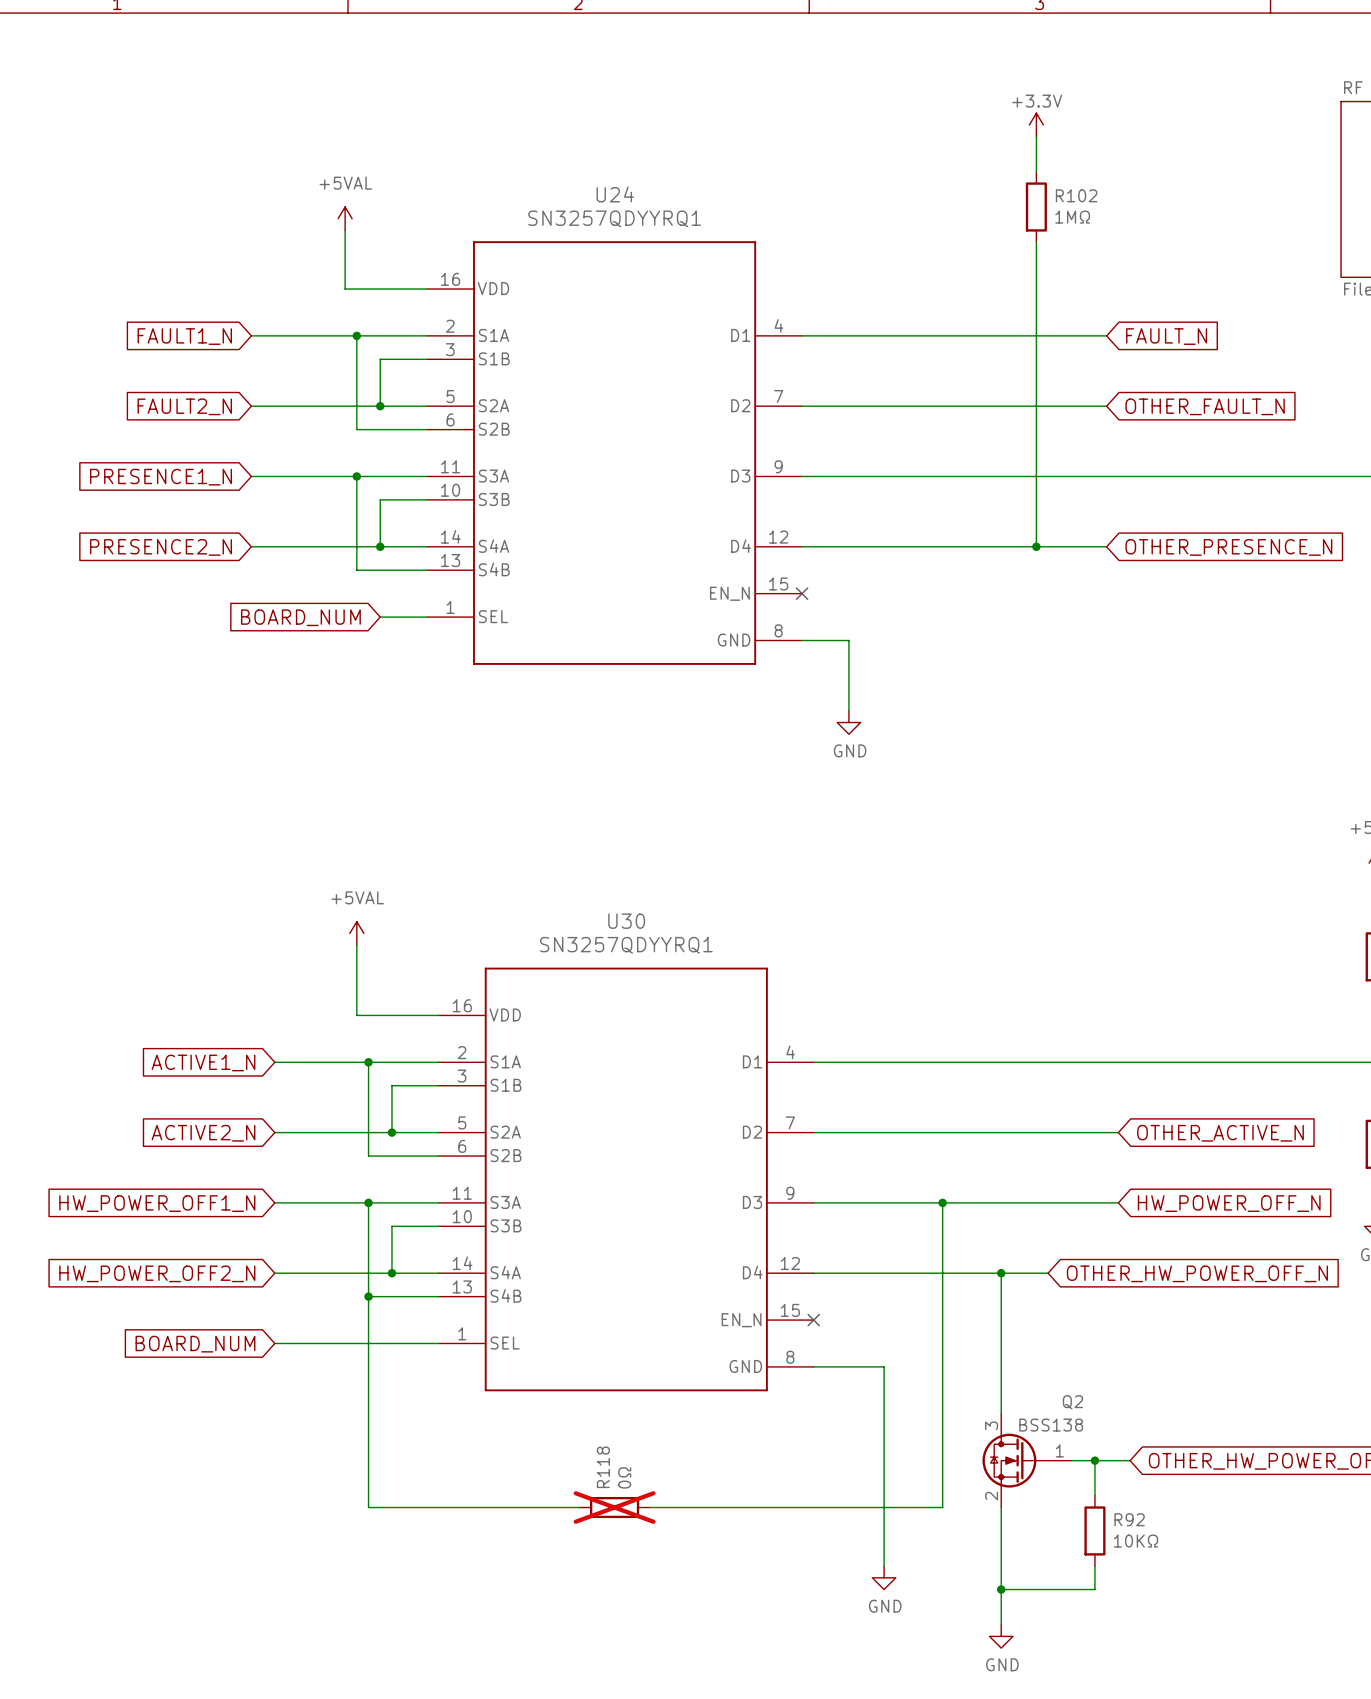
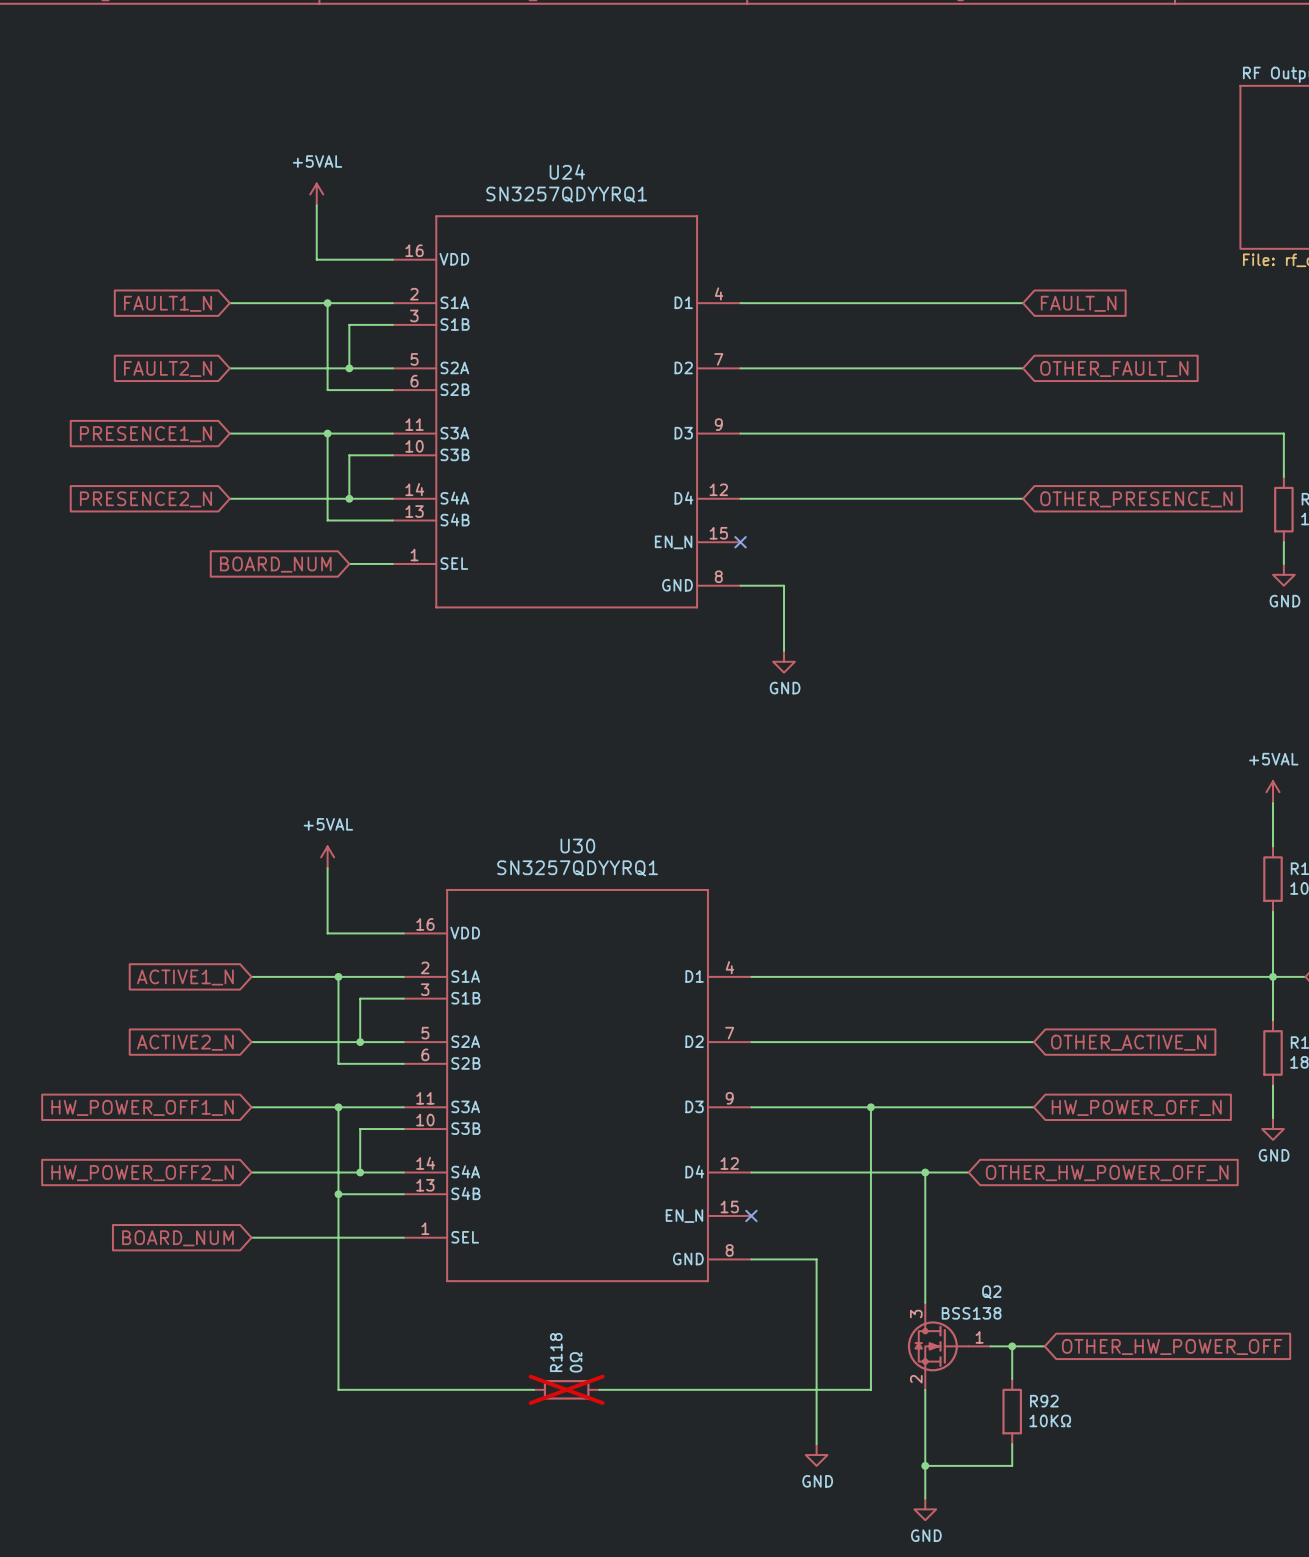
power symbol: +3.3V (1036, 124) -> none
wire: (1036, 136) (1036, 171) -> none
R102: 1MΩ (1036, 207) -> none
wire: (1036, 242) (1036, 546) -> none
junction: (1036, 546) -> none

